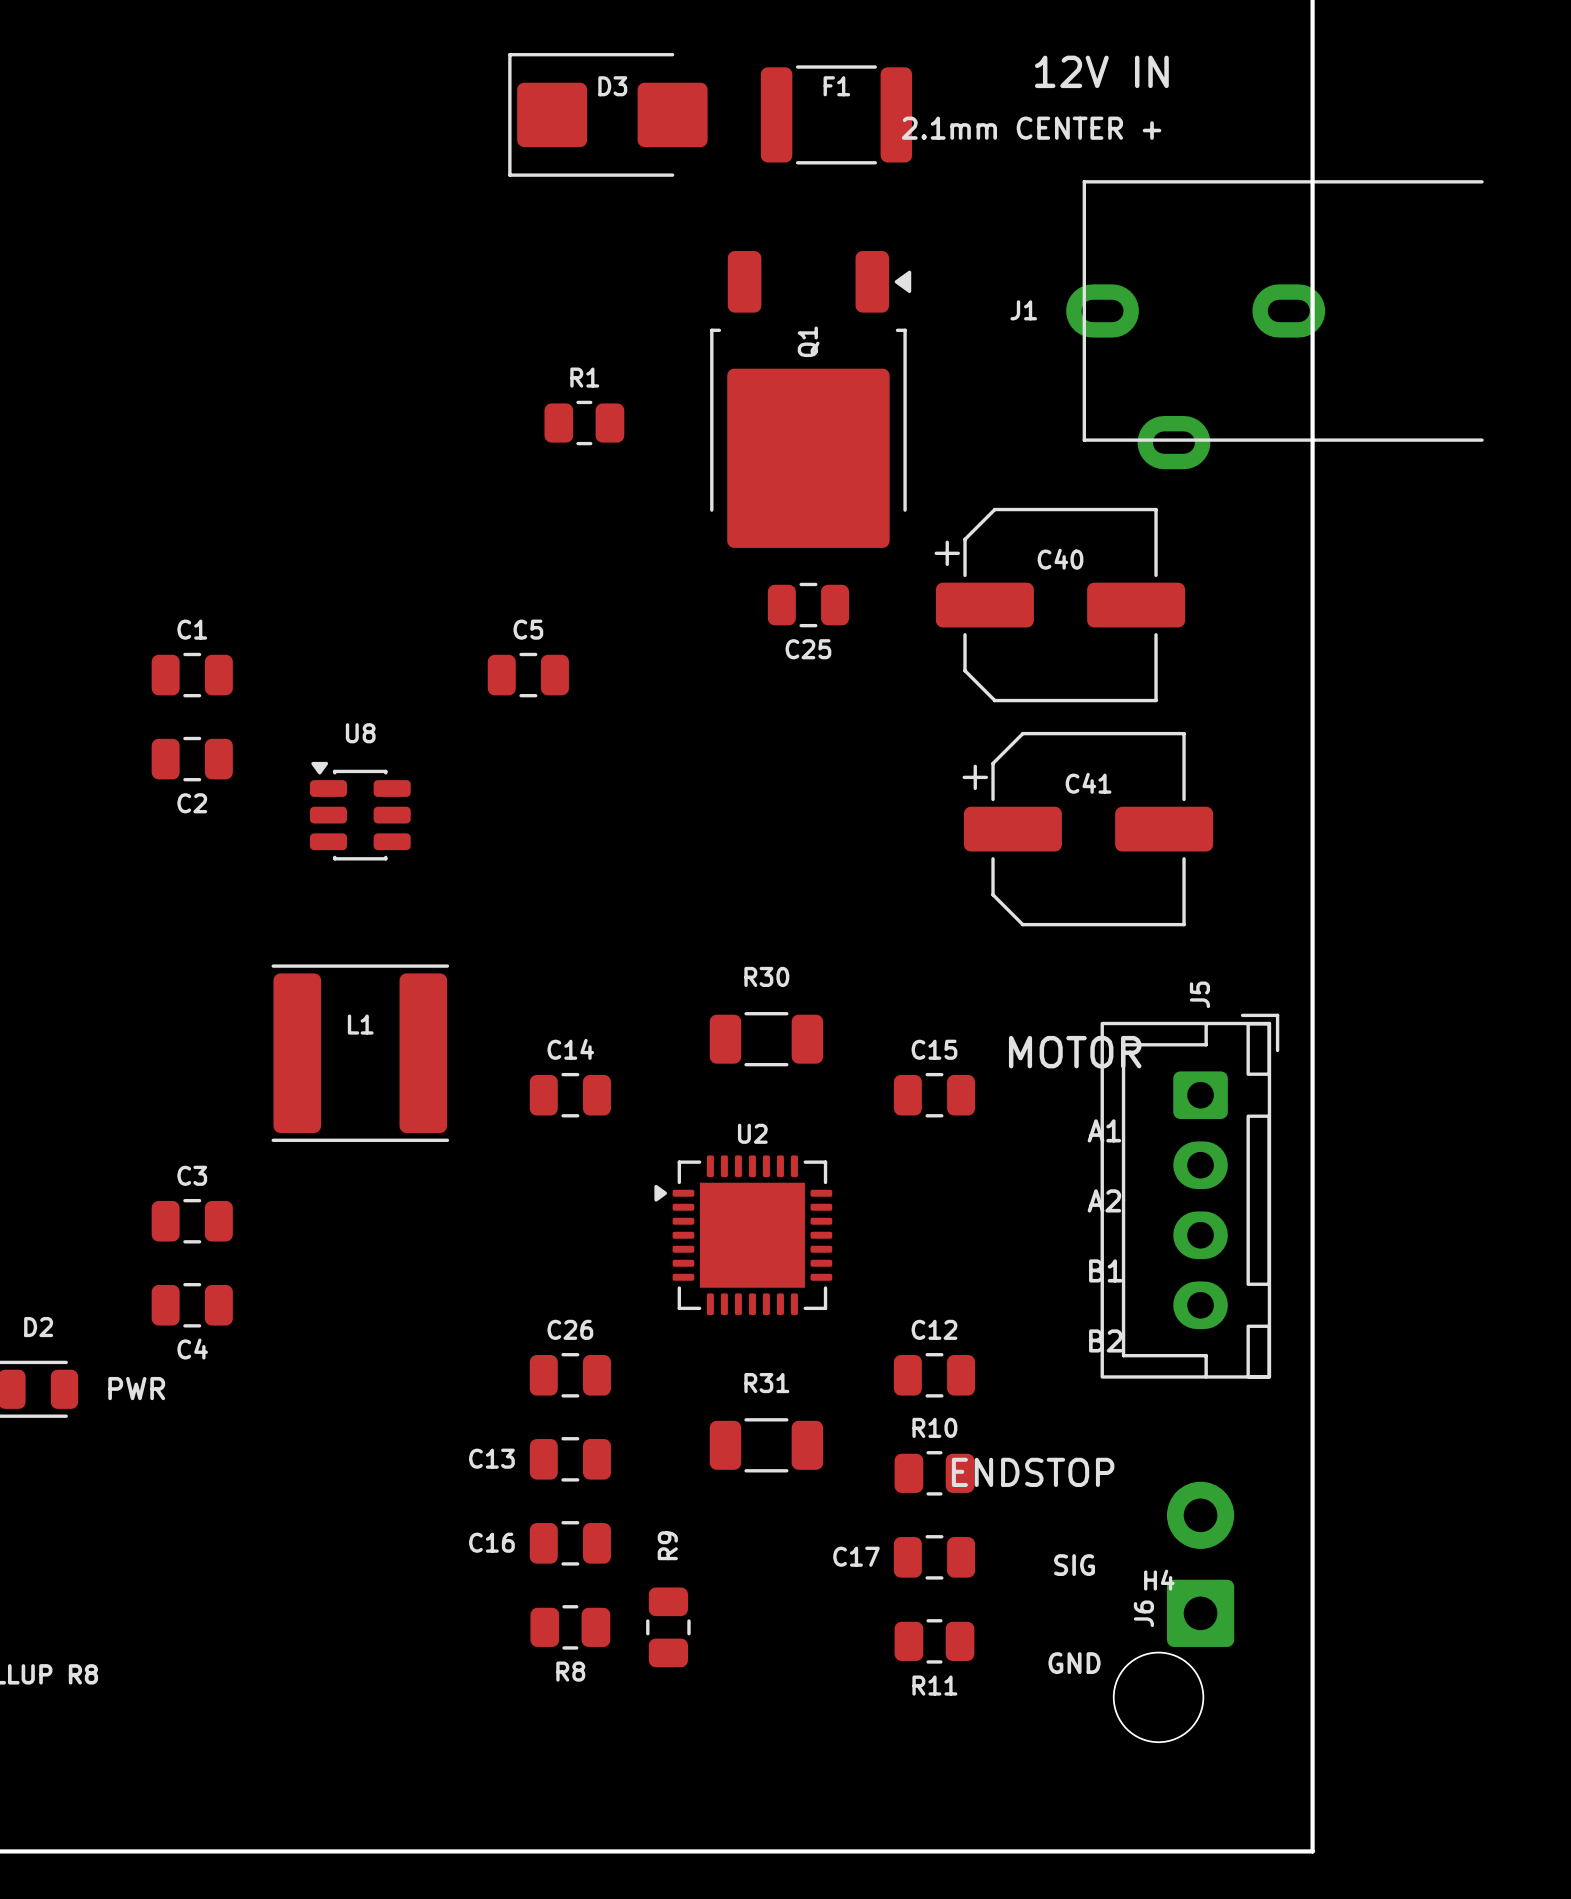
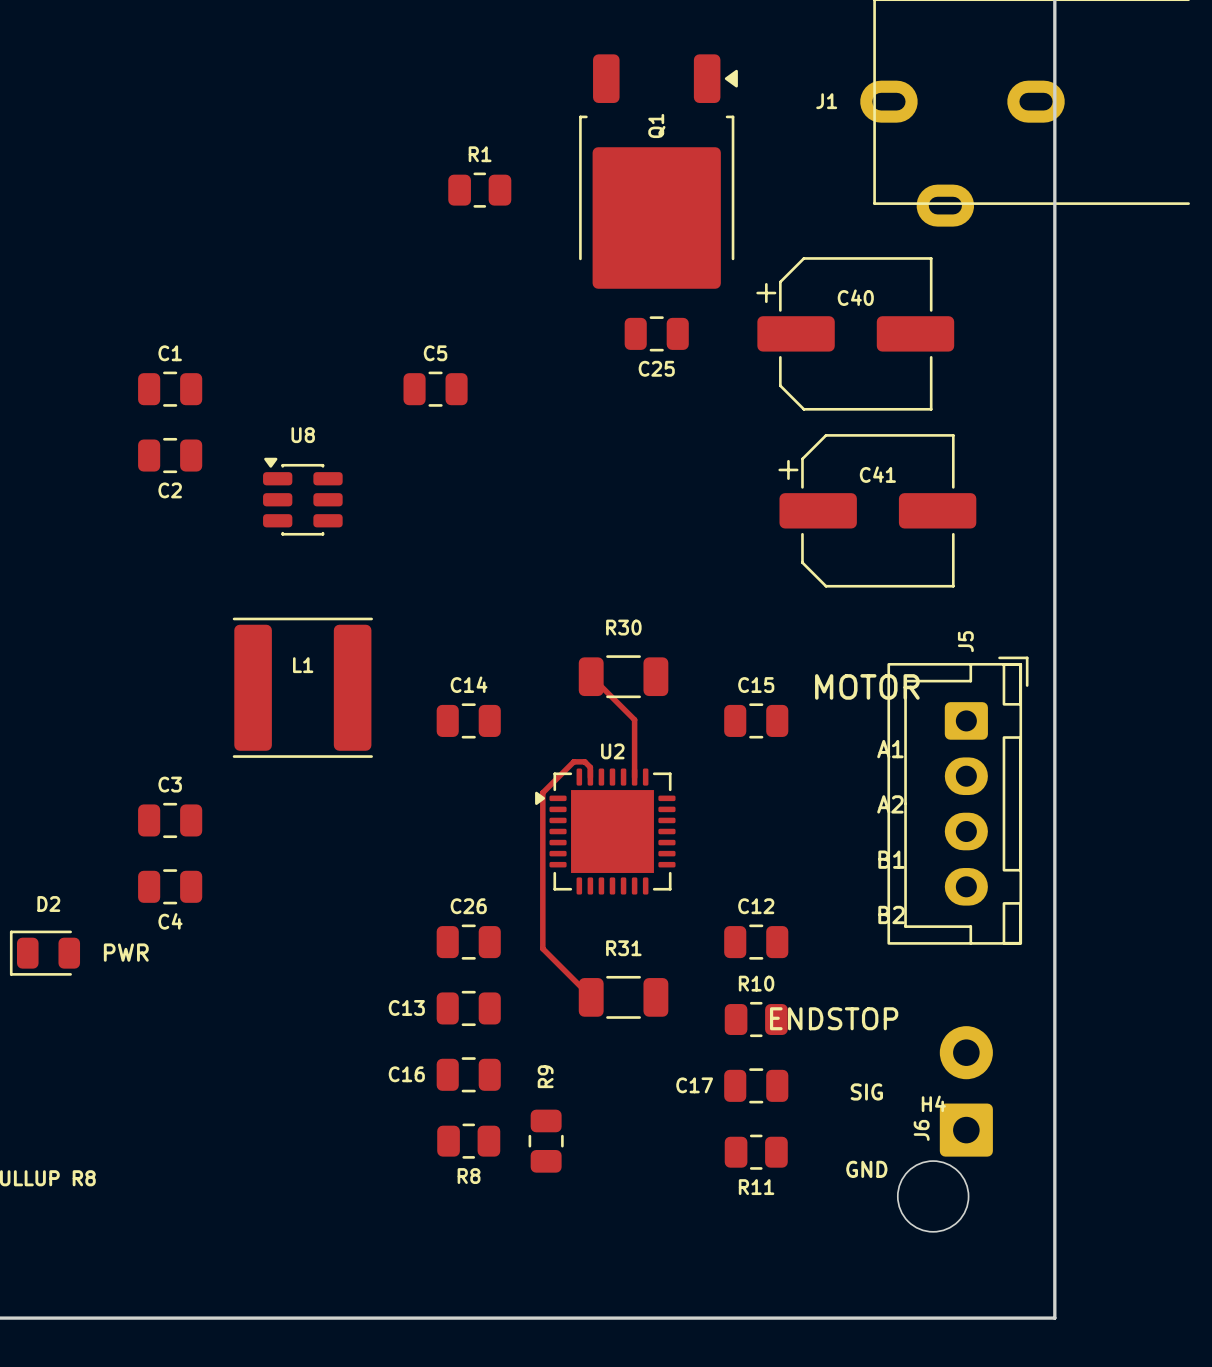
track: none -> (591, 676) (634, 719) (634, 777)
track: none -> (590, 777) (590, 767) (584, 761) (573, 761) (542, 792) (542, 948) (591, 997)

